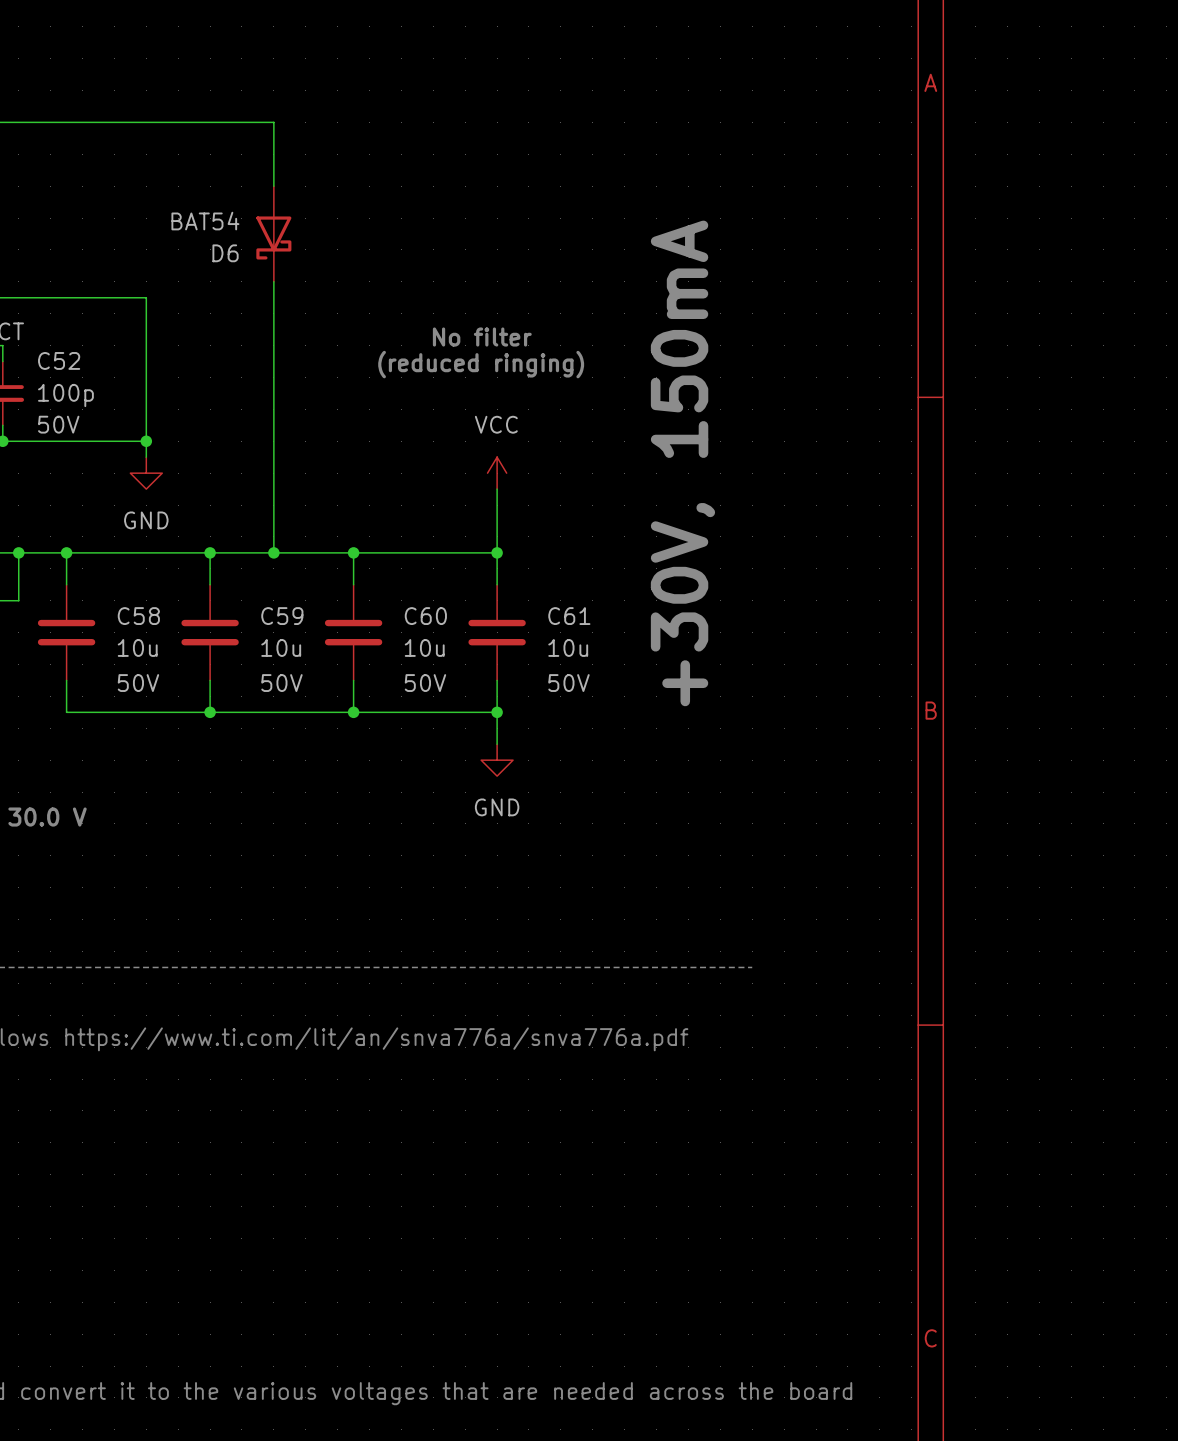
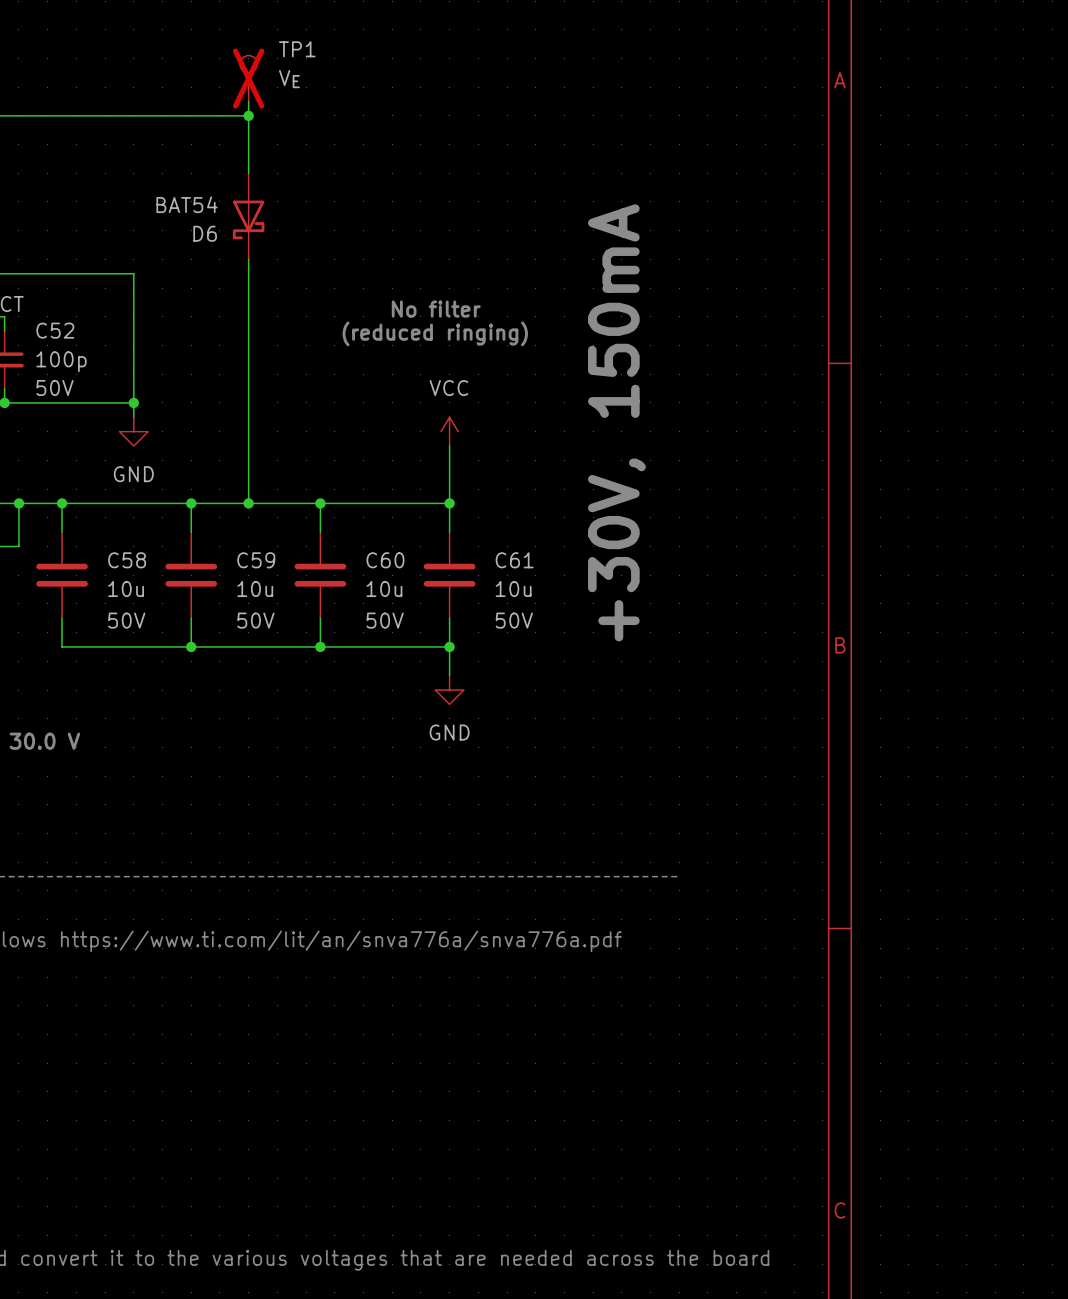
TP1: none -> VE (248, 78)
wire: none -> (248, 101) (248, 115)
junction: none -> (248, 115)

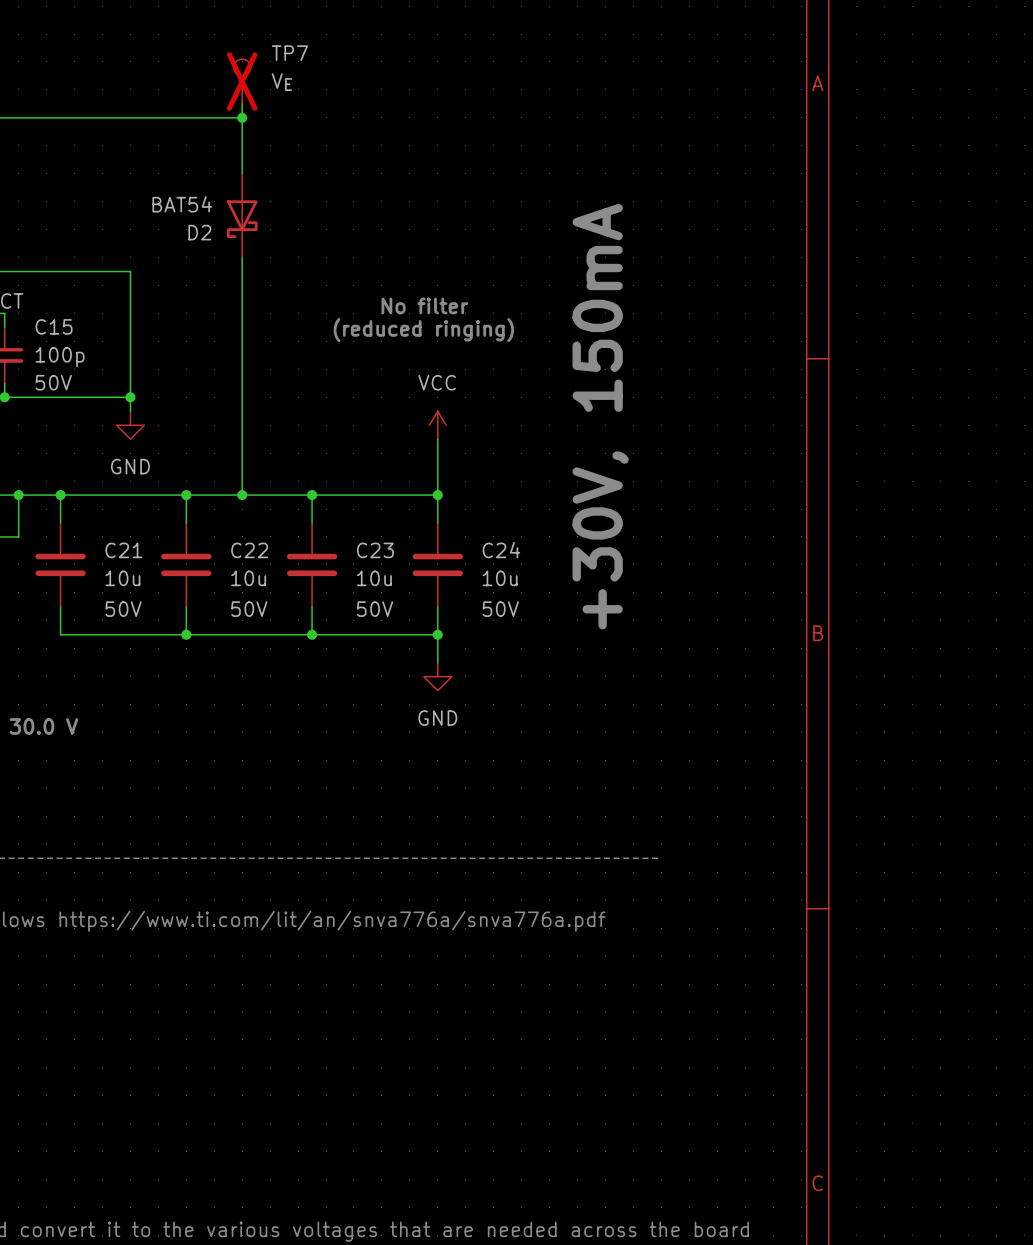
TP1 name: TP1 (297, 49) -> TP7 (289, 53)
D6 name: D6 (205, 233) -> D2 (199, 232)
C52 name: C52 (55, 330) -> C15 (54, 326)
C58 name: C58 (127, 560) -> C21 (123, 550)
C59 name: C59 (256, 560) -> C22 (249, 550)
C60 name: C60 (385, 560) -> C23 (375, 550)
C61 name: C61 (514, 560) -> C24 (501, 550)

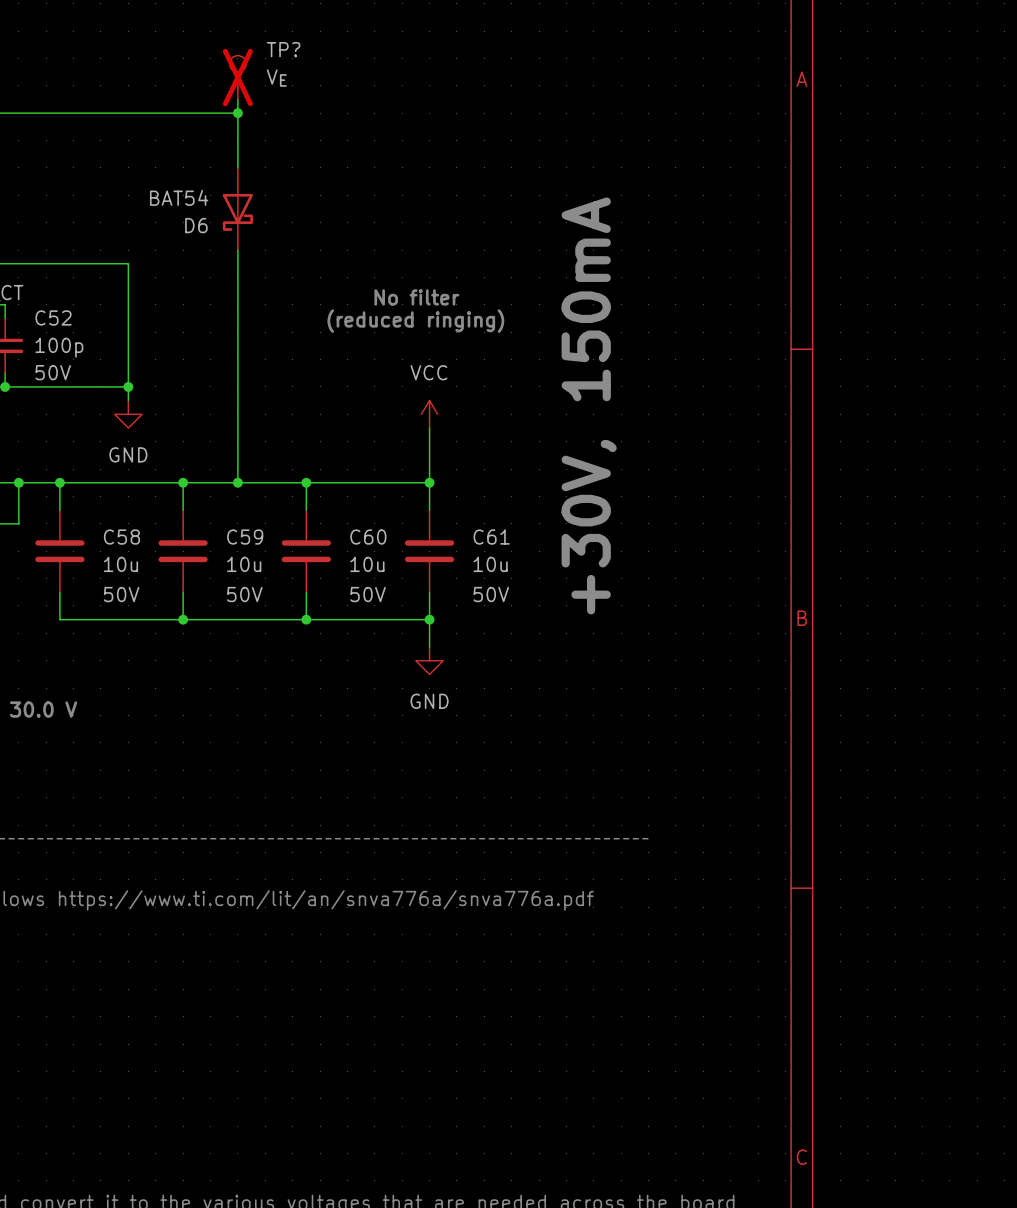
TP7 name: TP7 (289, 53) -> TP? (283, 49)
D2 name: D2 (199, 232) -> D6 (196, 225)
C15 name: C15 (54, 326) -> C52 (53, 317)
C21 name: C21 (123, 550) -> C58 (121, 537)
C22 name: C22 (249, 550) -> C59 (245, 537)
C23 name: C23 (375, 550) -> C60 (368, 537)
C24 name: C24 (501, 550) -> C61 (491, 537)

